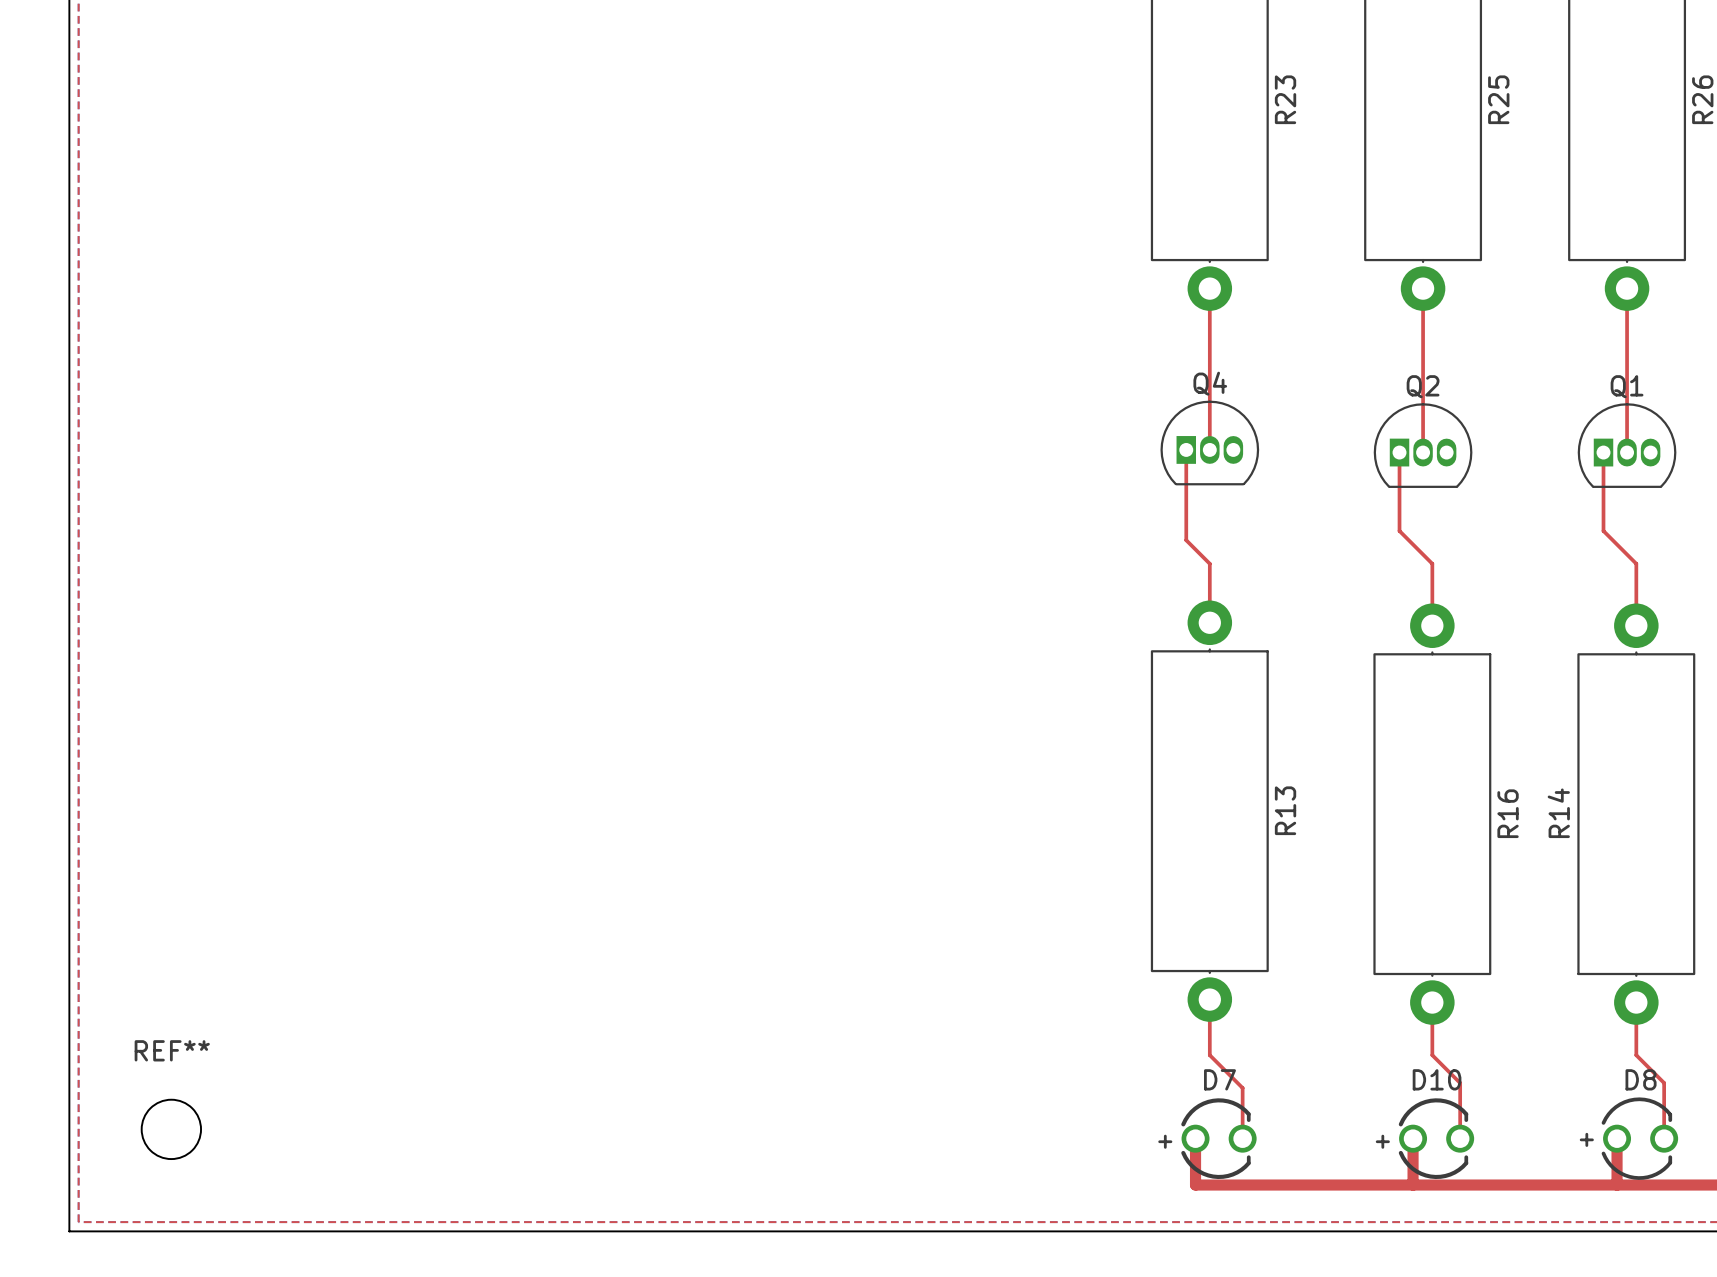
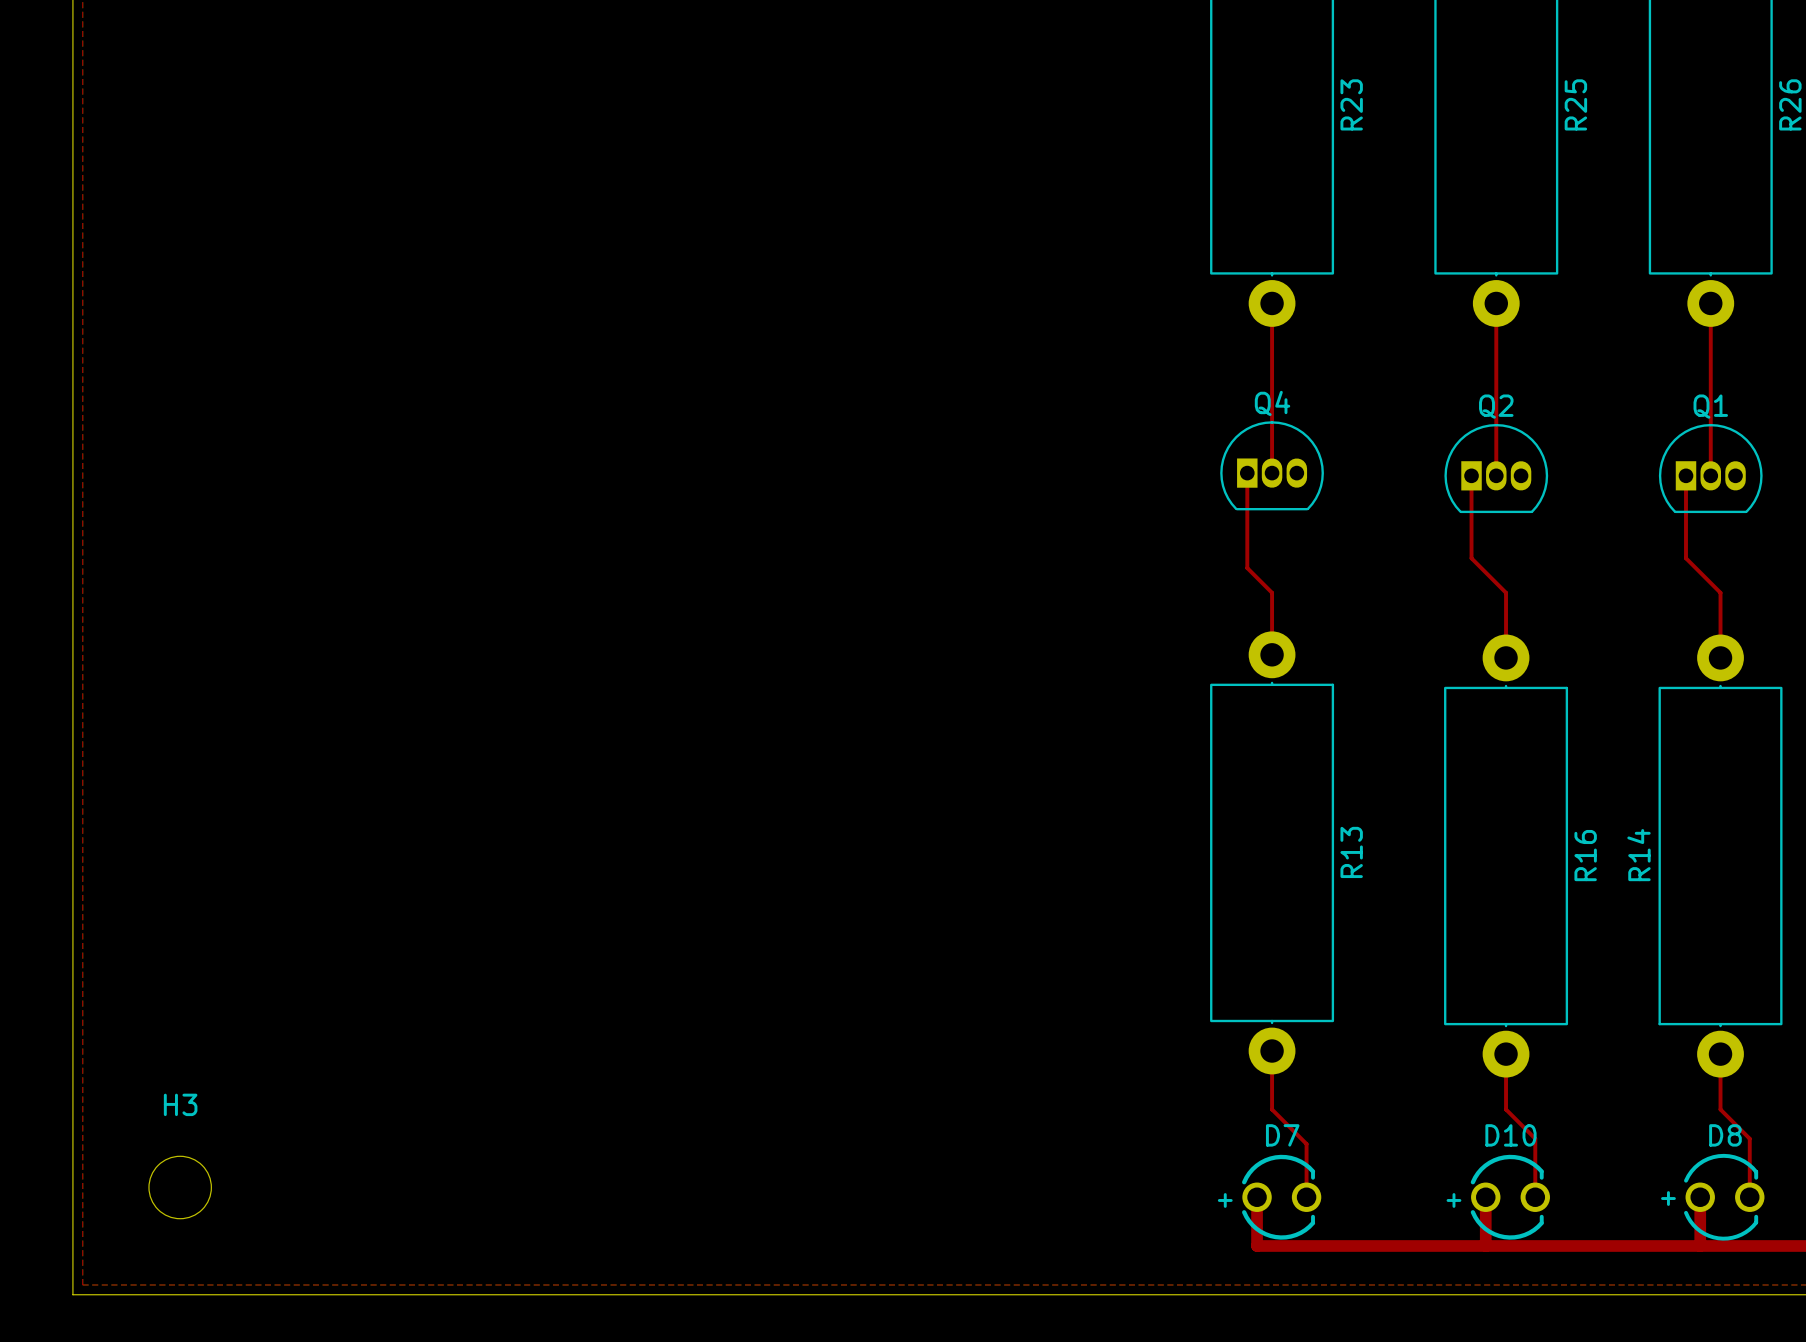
REF** name: REF** (172, 1050) -> H3 (180, 1104)

